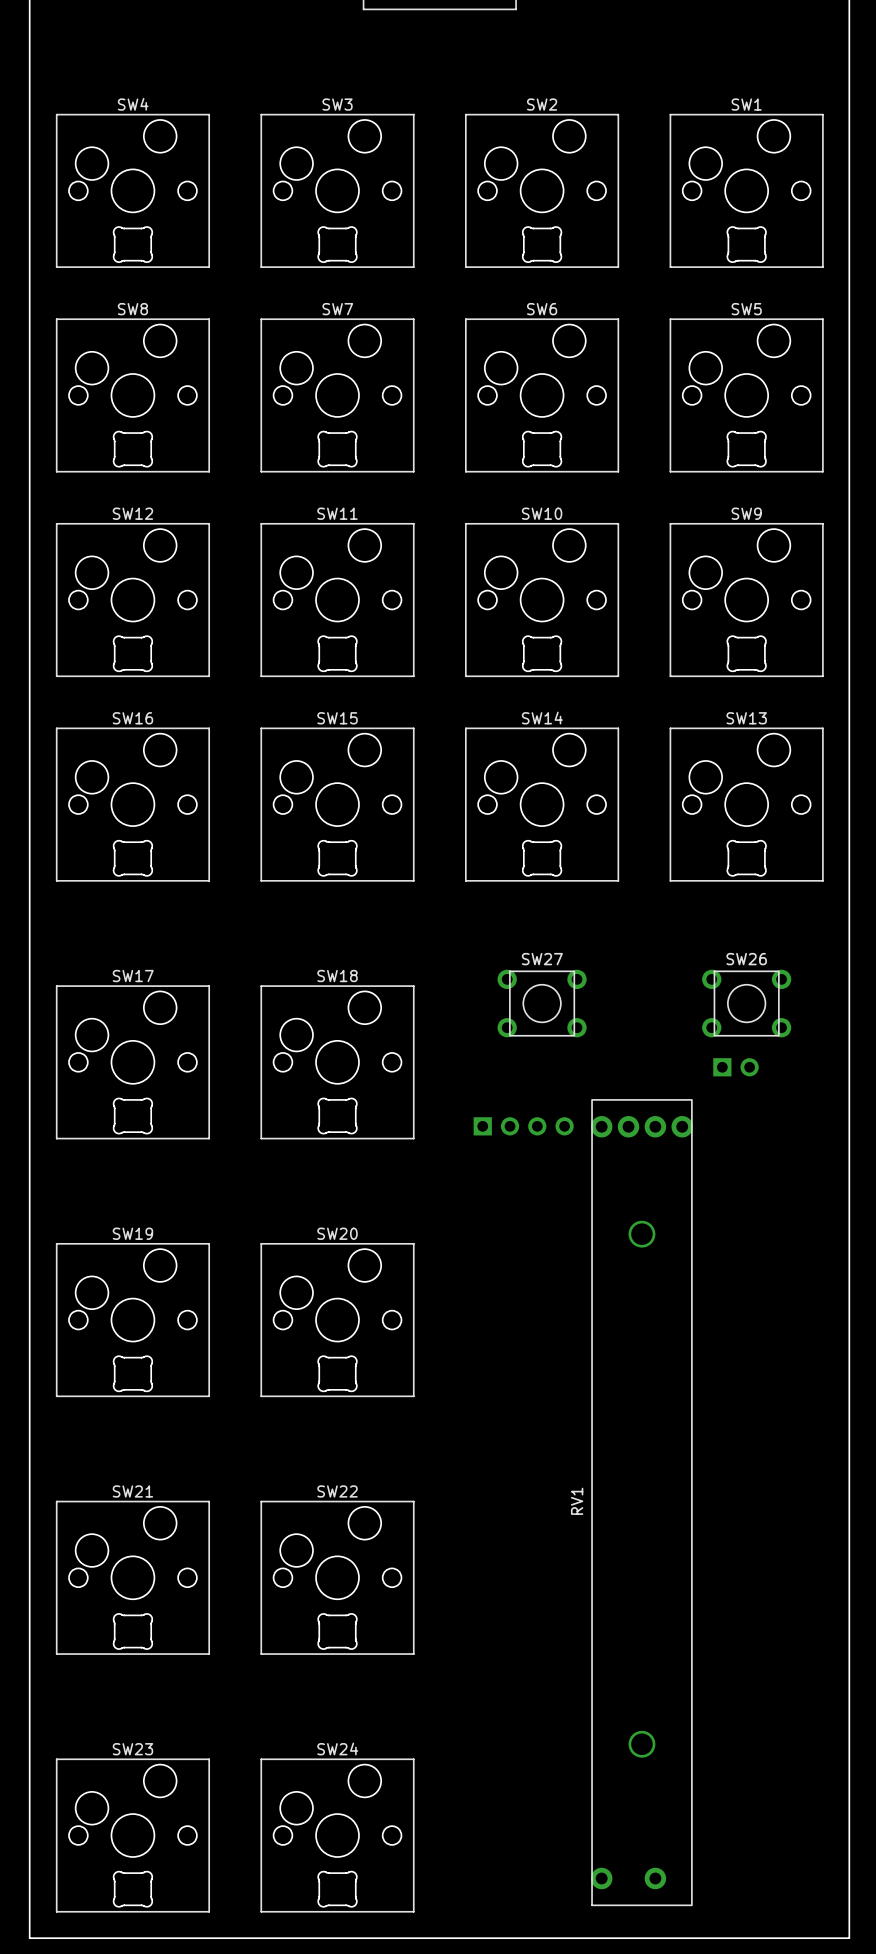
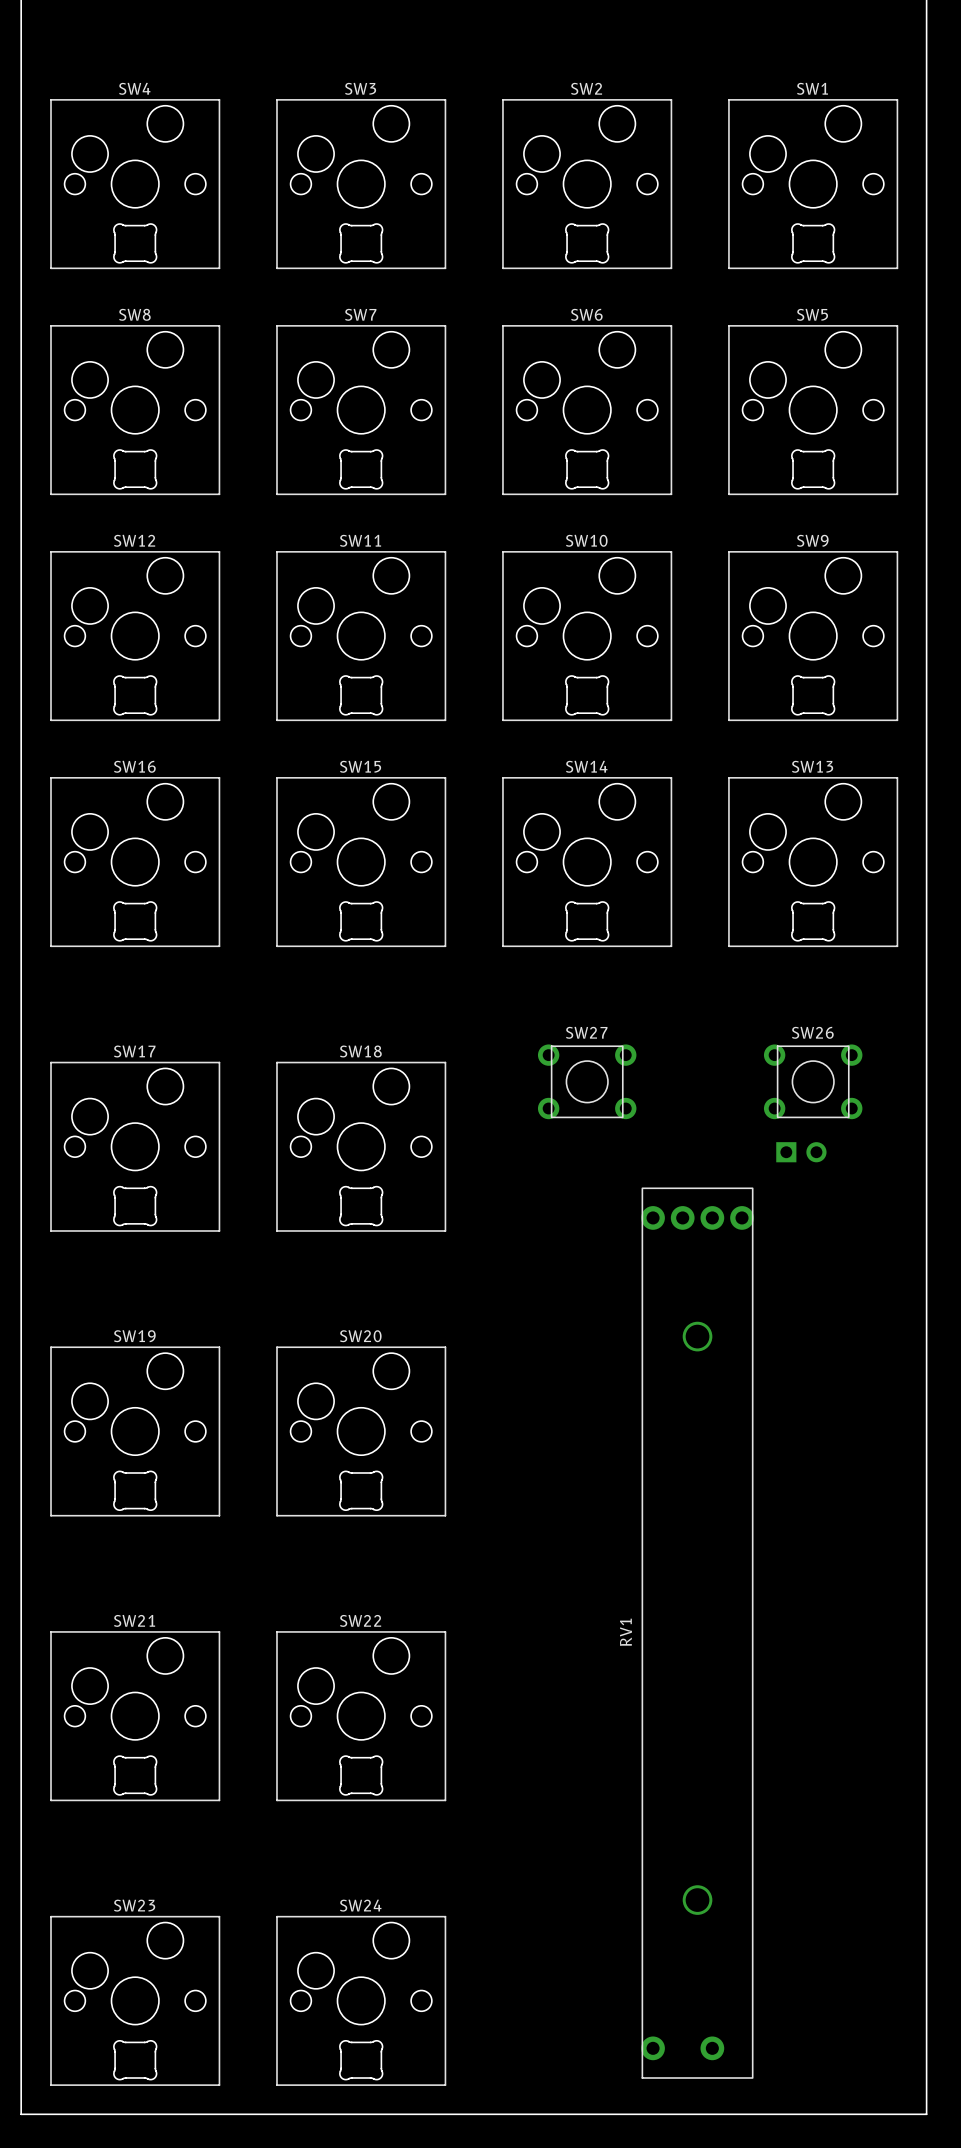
part: (523, 1126) -> none

